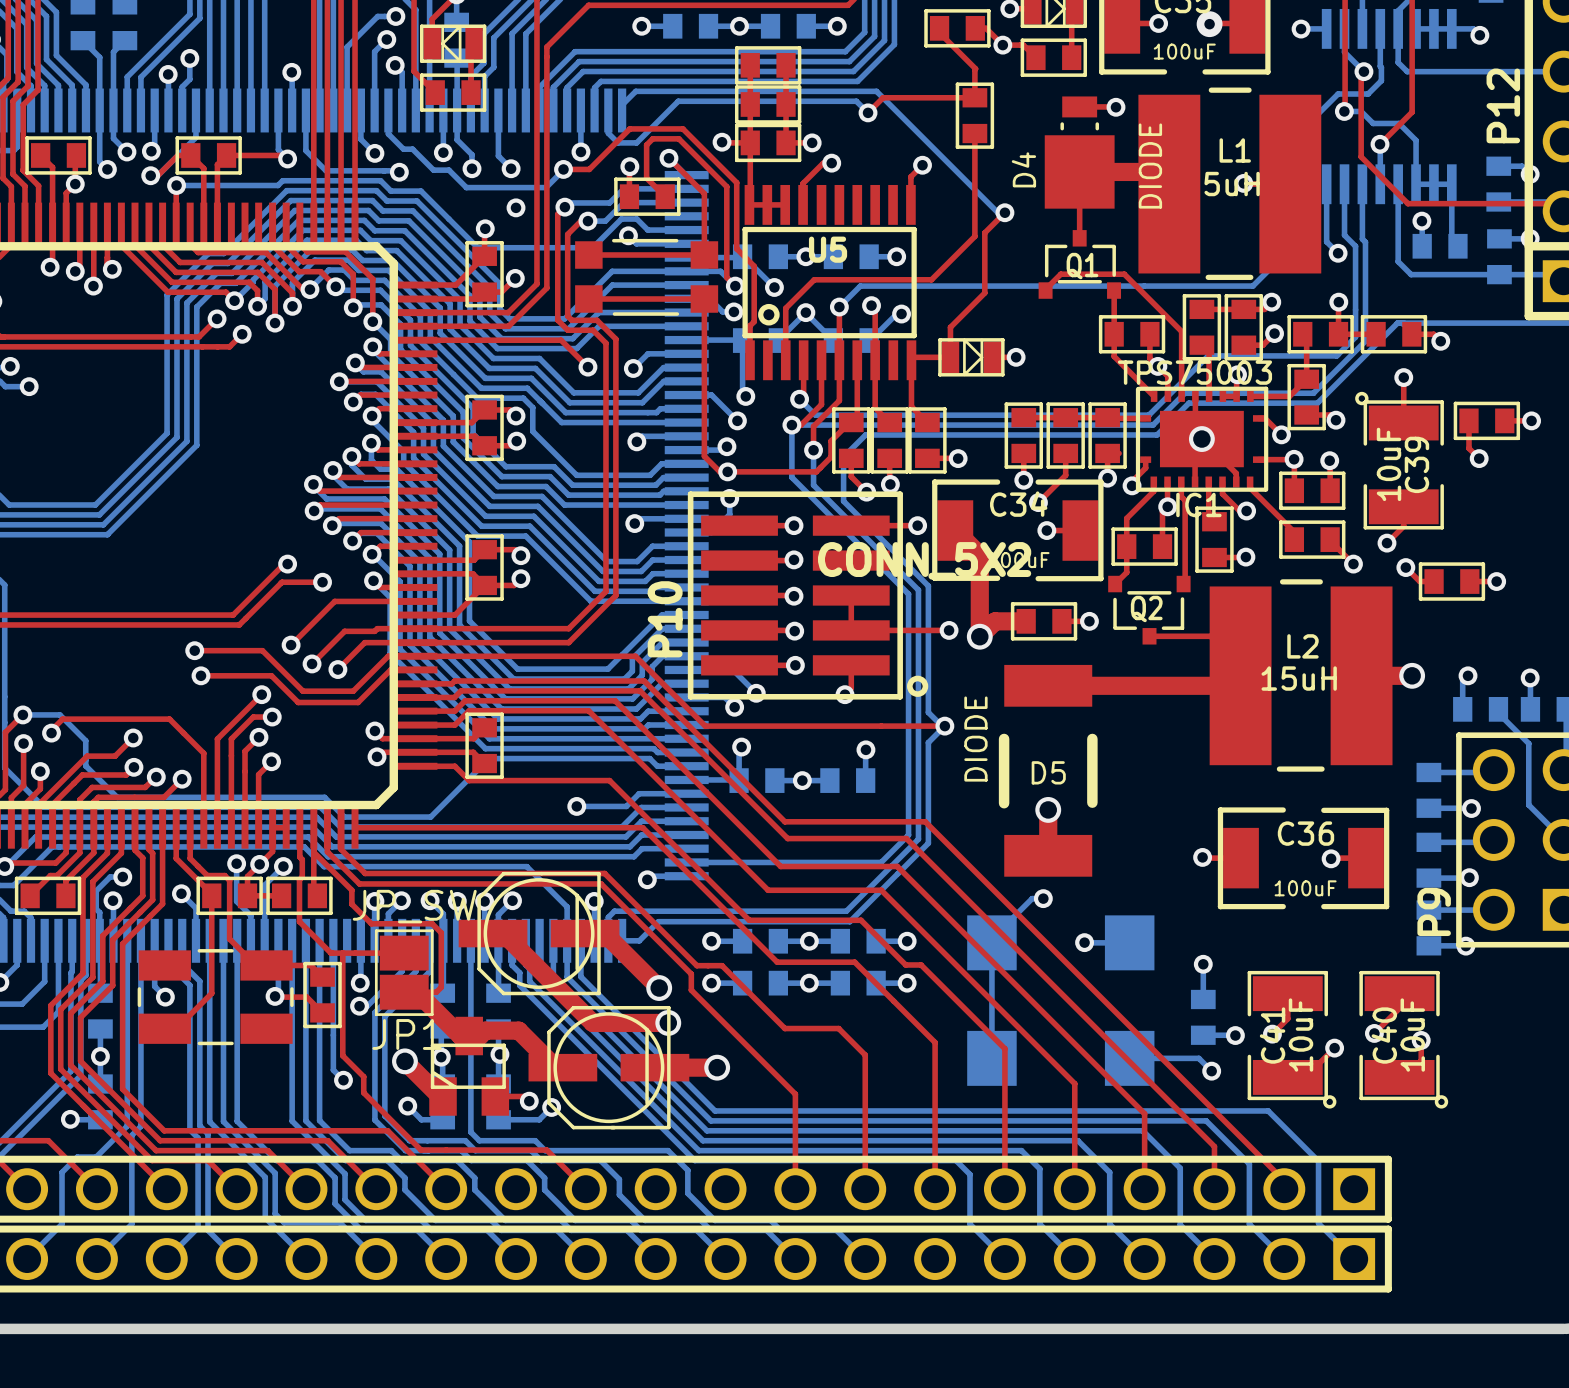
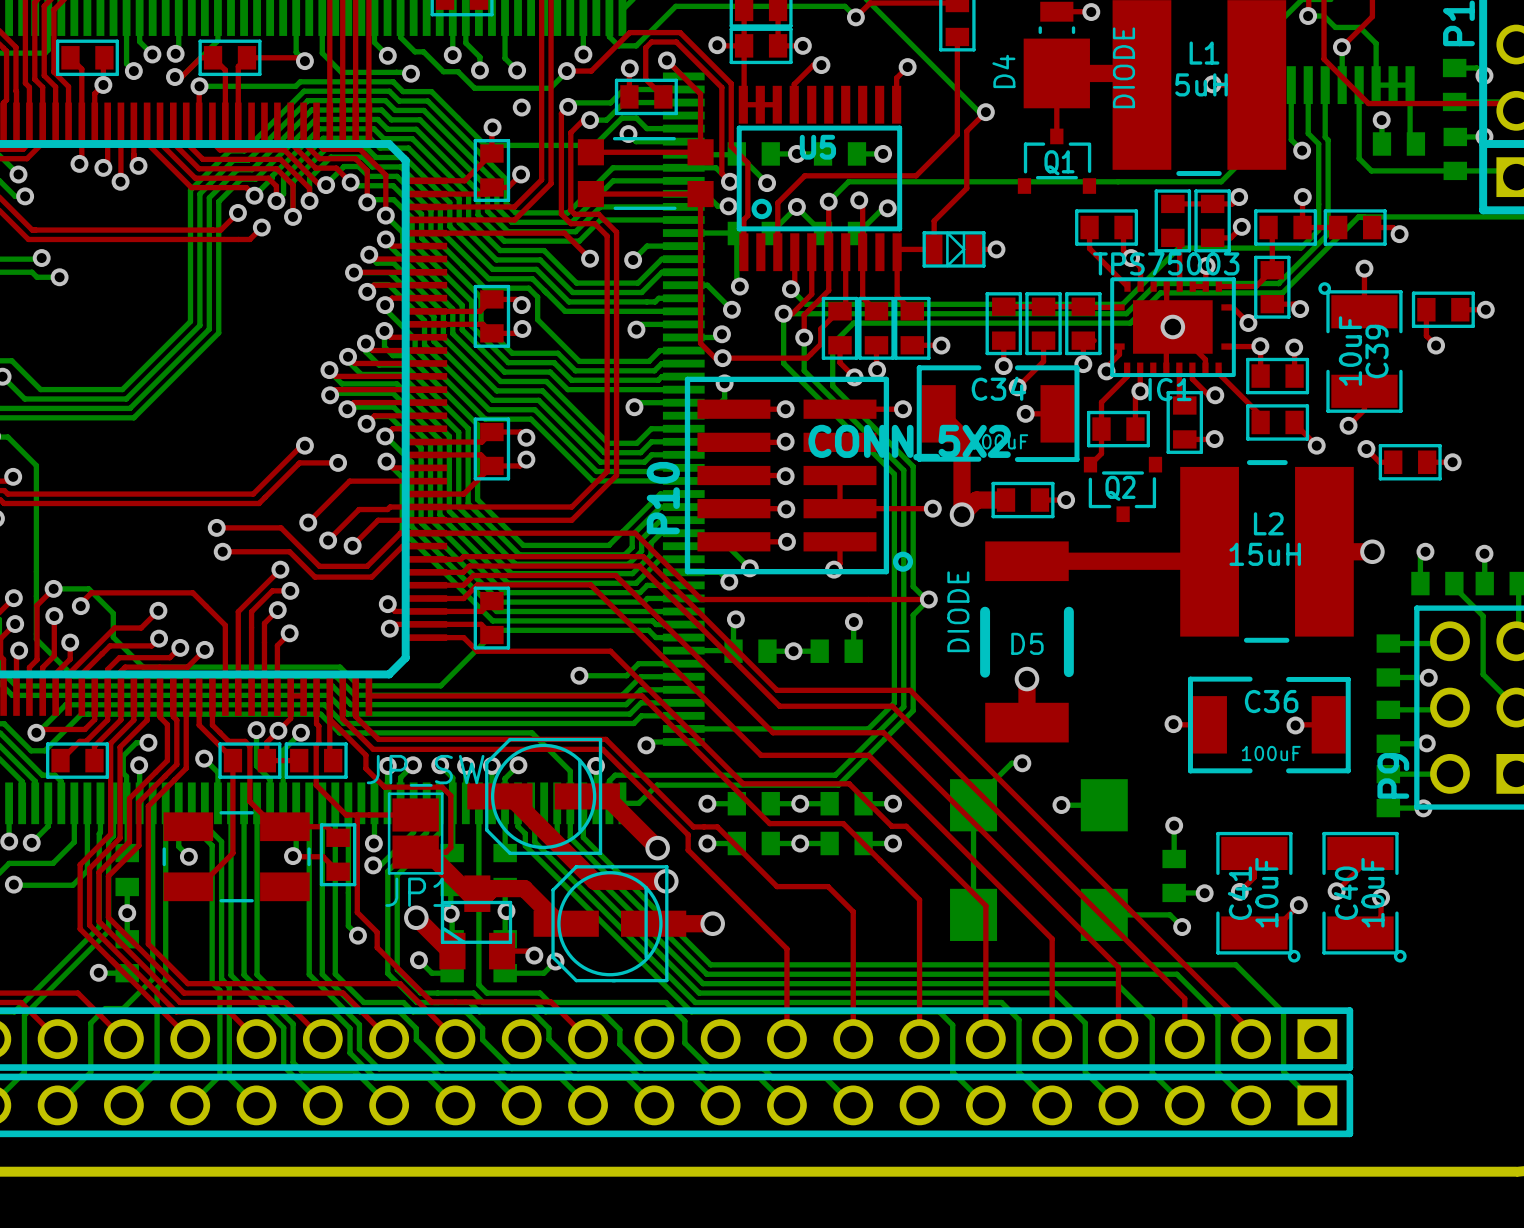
top track: (1045, 290) (1060, 274) (1124, 274) (1181, 331) (1181, 396) -> none
top track: (1114, 290) (1114, 334) -> none
top track: (1181, 482) (1181, 496) (1185, 500) (1185, 582) (1183, 584) -> none
top track: (1149, 636) (1210, 636) (1240, 666) (1240, 675) -> none

